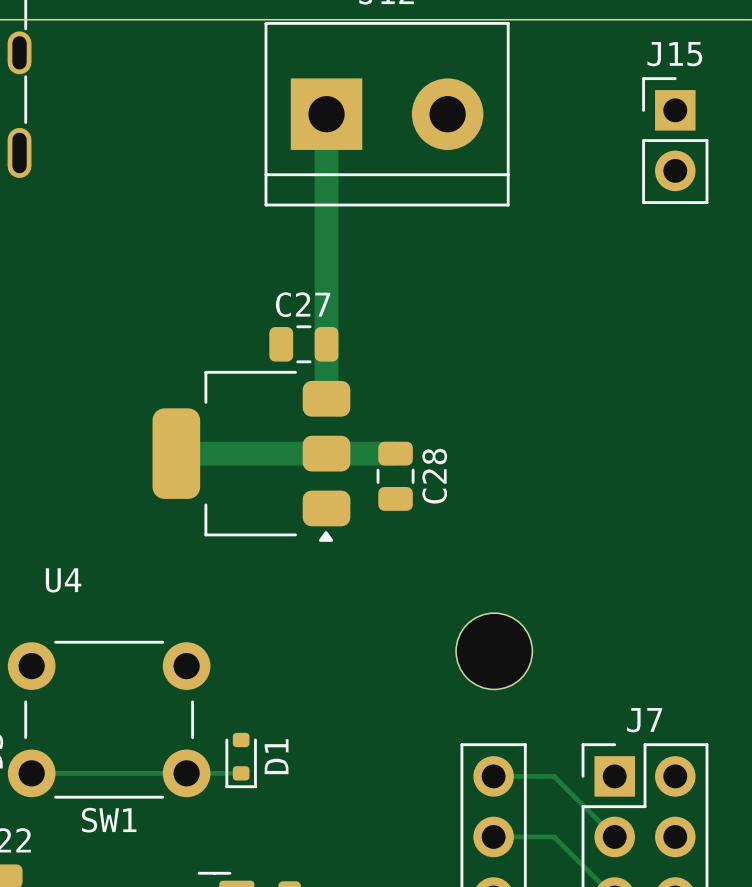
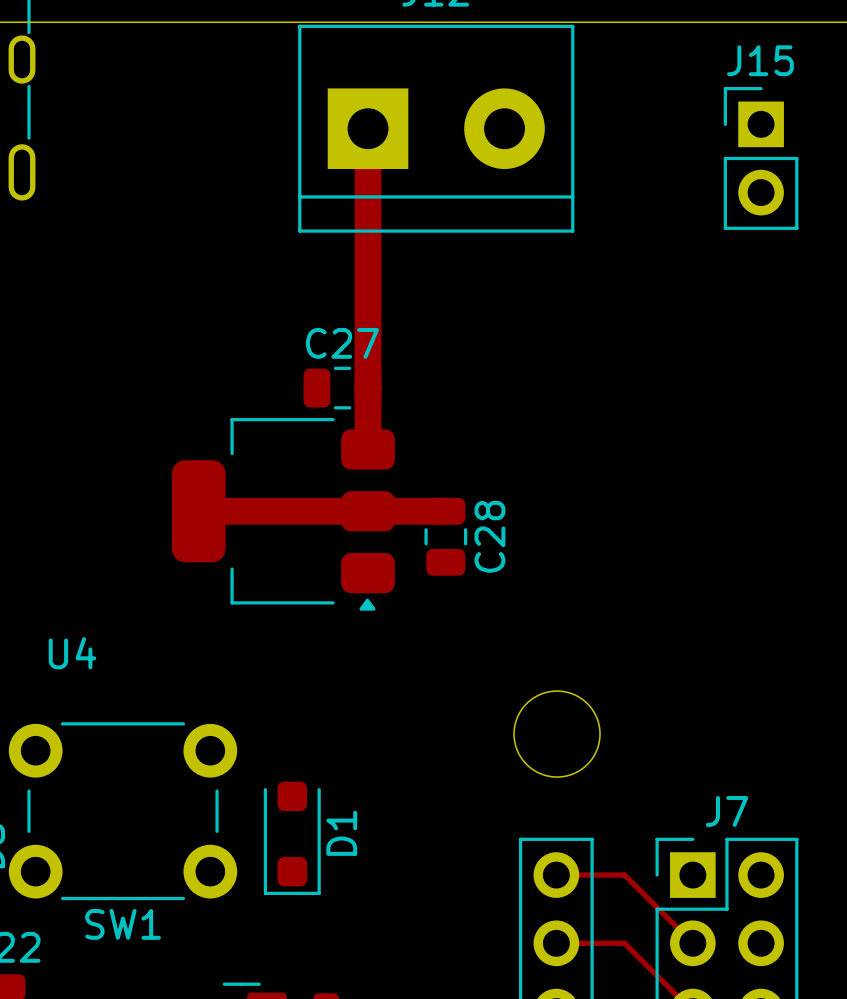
D1 footprint: [225, 732, 257, 789] -> [263, 781, 321, 896]
track: (31, 773) (241, 773) -> none

